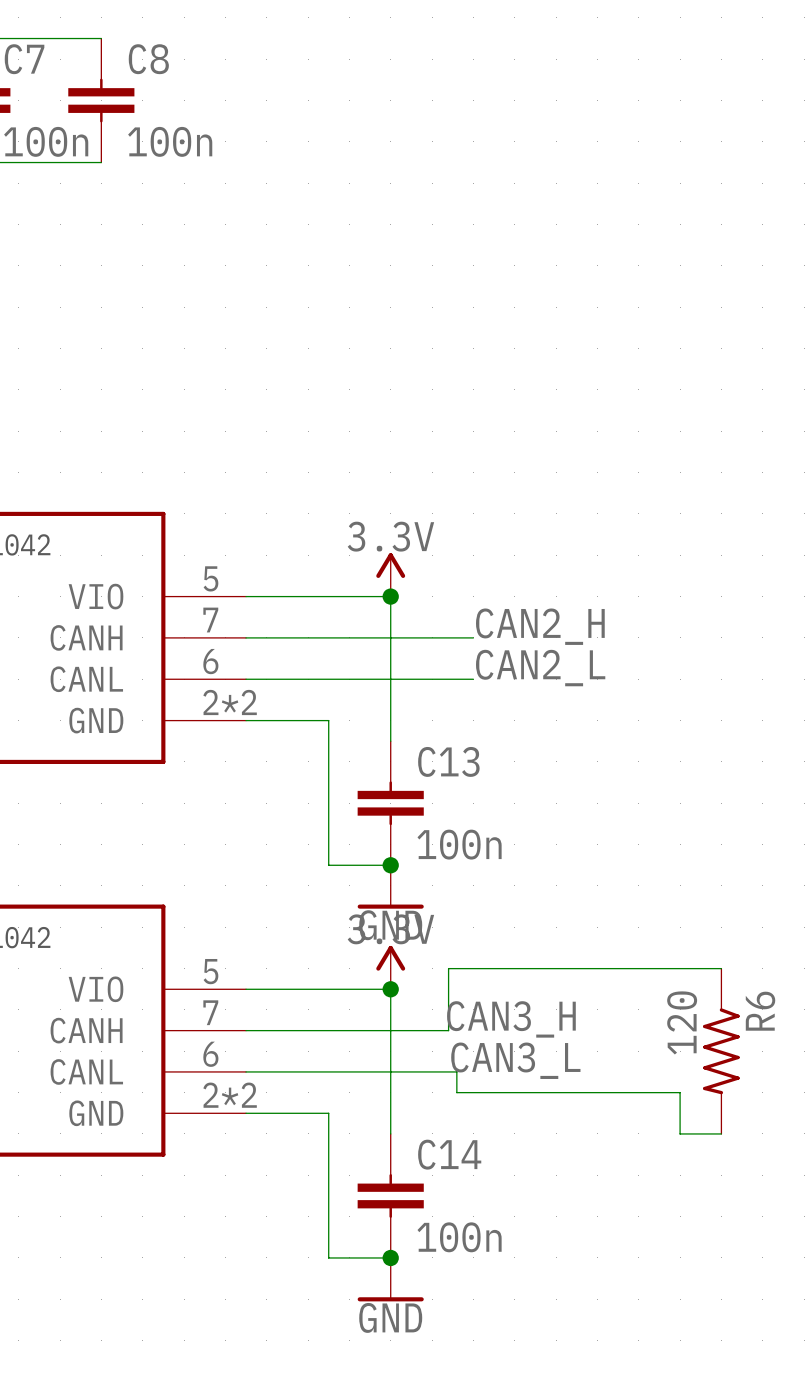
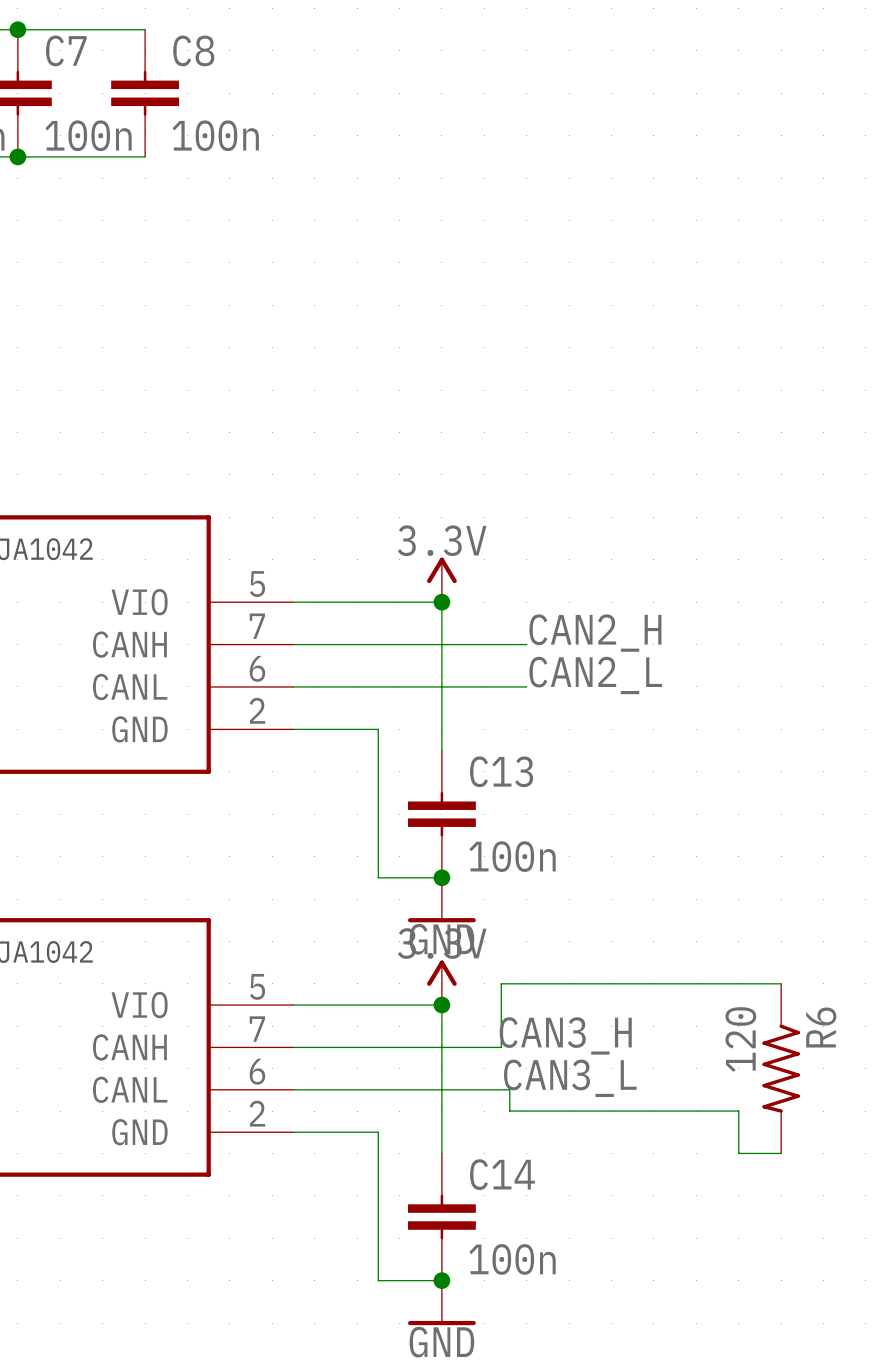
part pin number: 2*2 (230, 702) -> 2 (257, 710)
part pin number: 2*2 (230, 1095) -> 2 (257, 1113)

